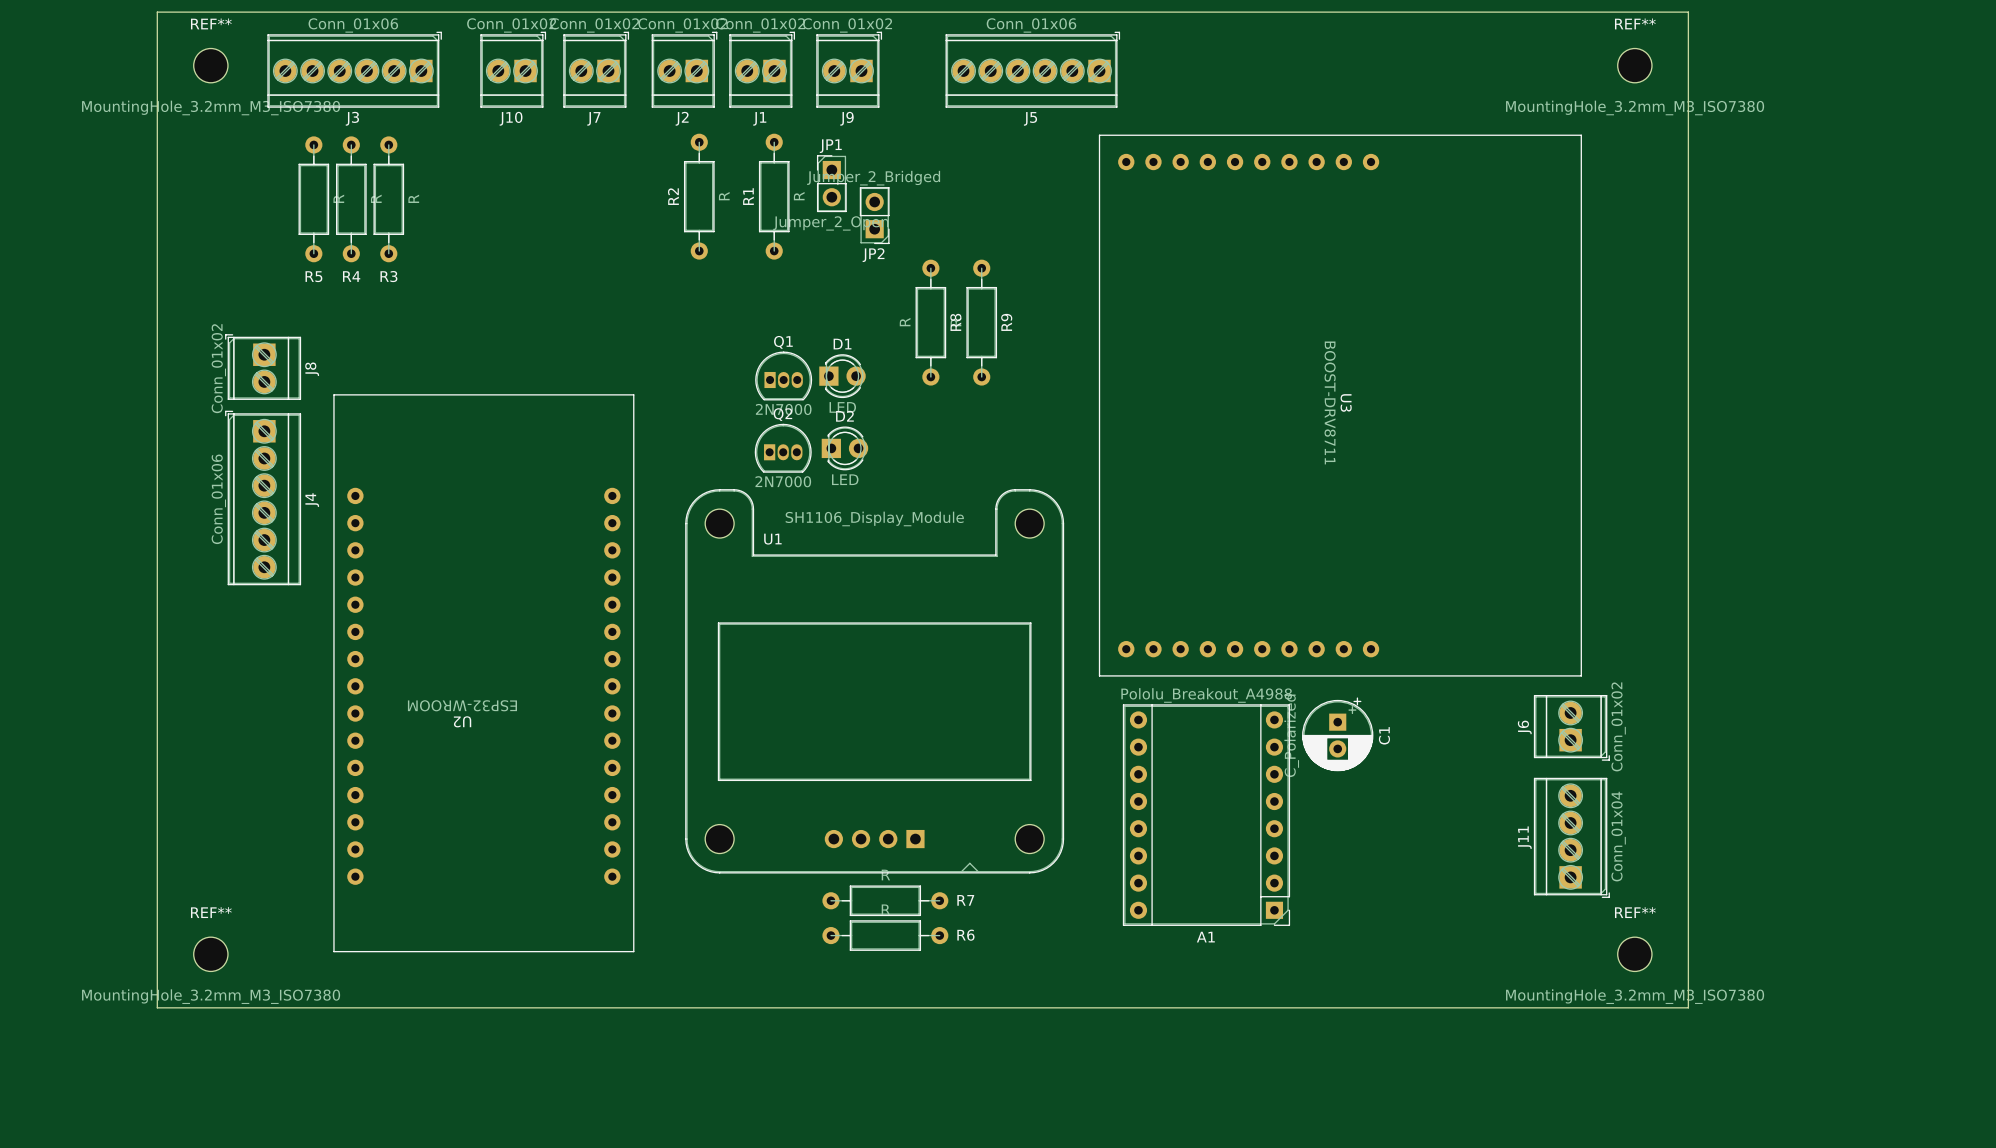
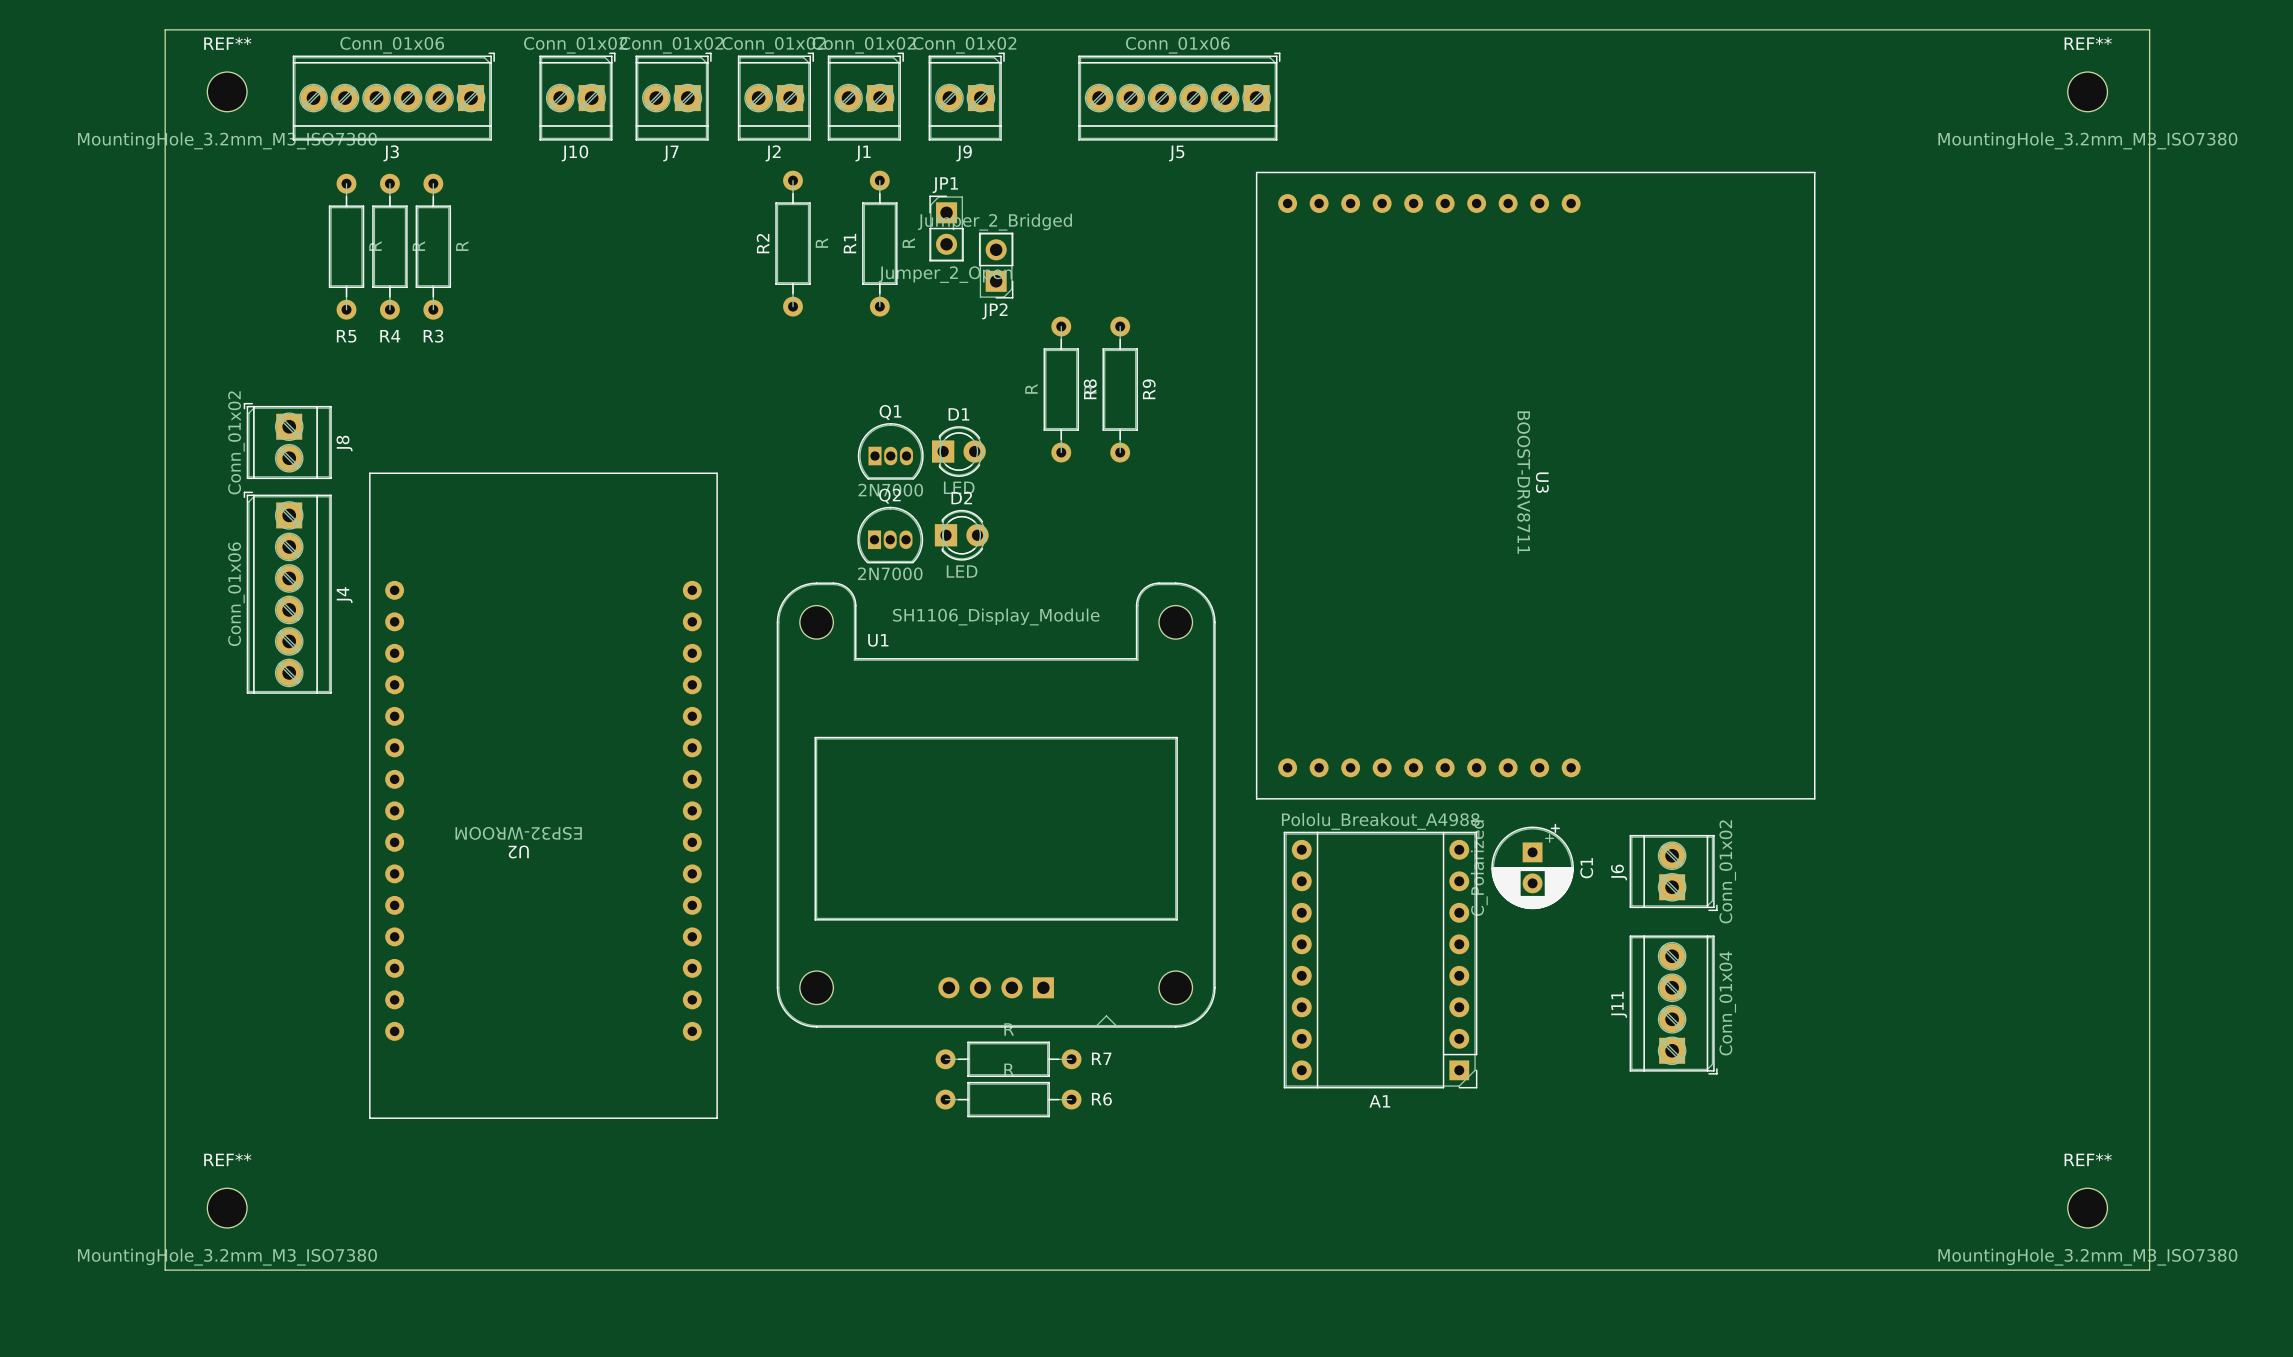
board edge: (1688, 12) (1688, 1007) (157, 1007) -> (1938, 29) (2149, 29) (2149, 1270) (165, 1270) (165, 1183)
REF** position: (1634, 65) -> (2087, 91)
J6 position: (1571, 727) -> (1673, 872)
J11 position: (1571, 837) -> (1673, 1005)
REF** position: (210, 954) -> (227, 1208)
REF** position: (1634, 954) -> (2087, 1208)

